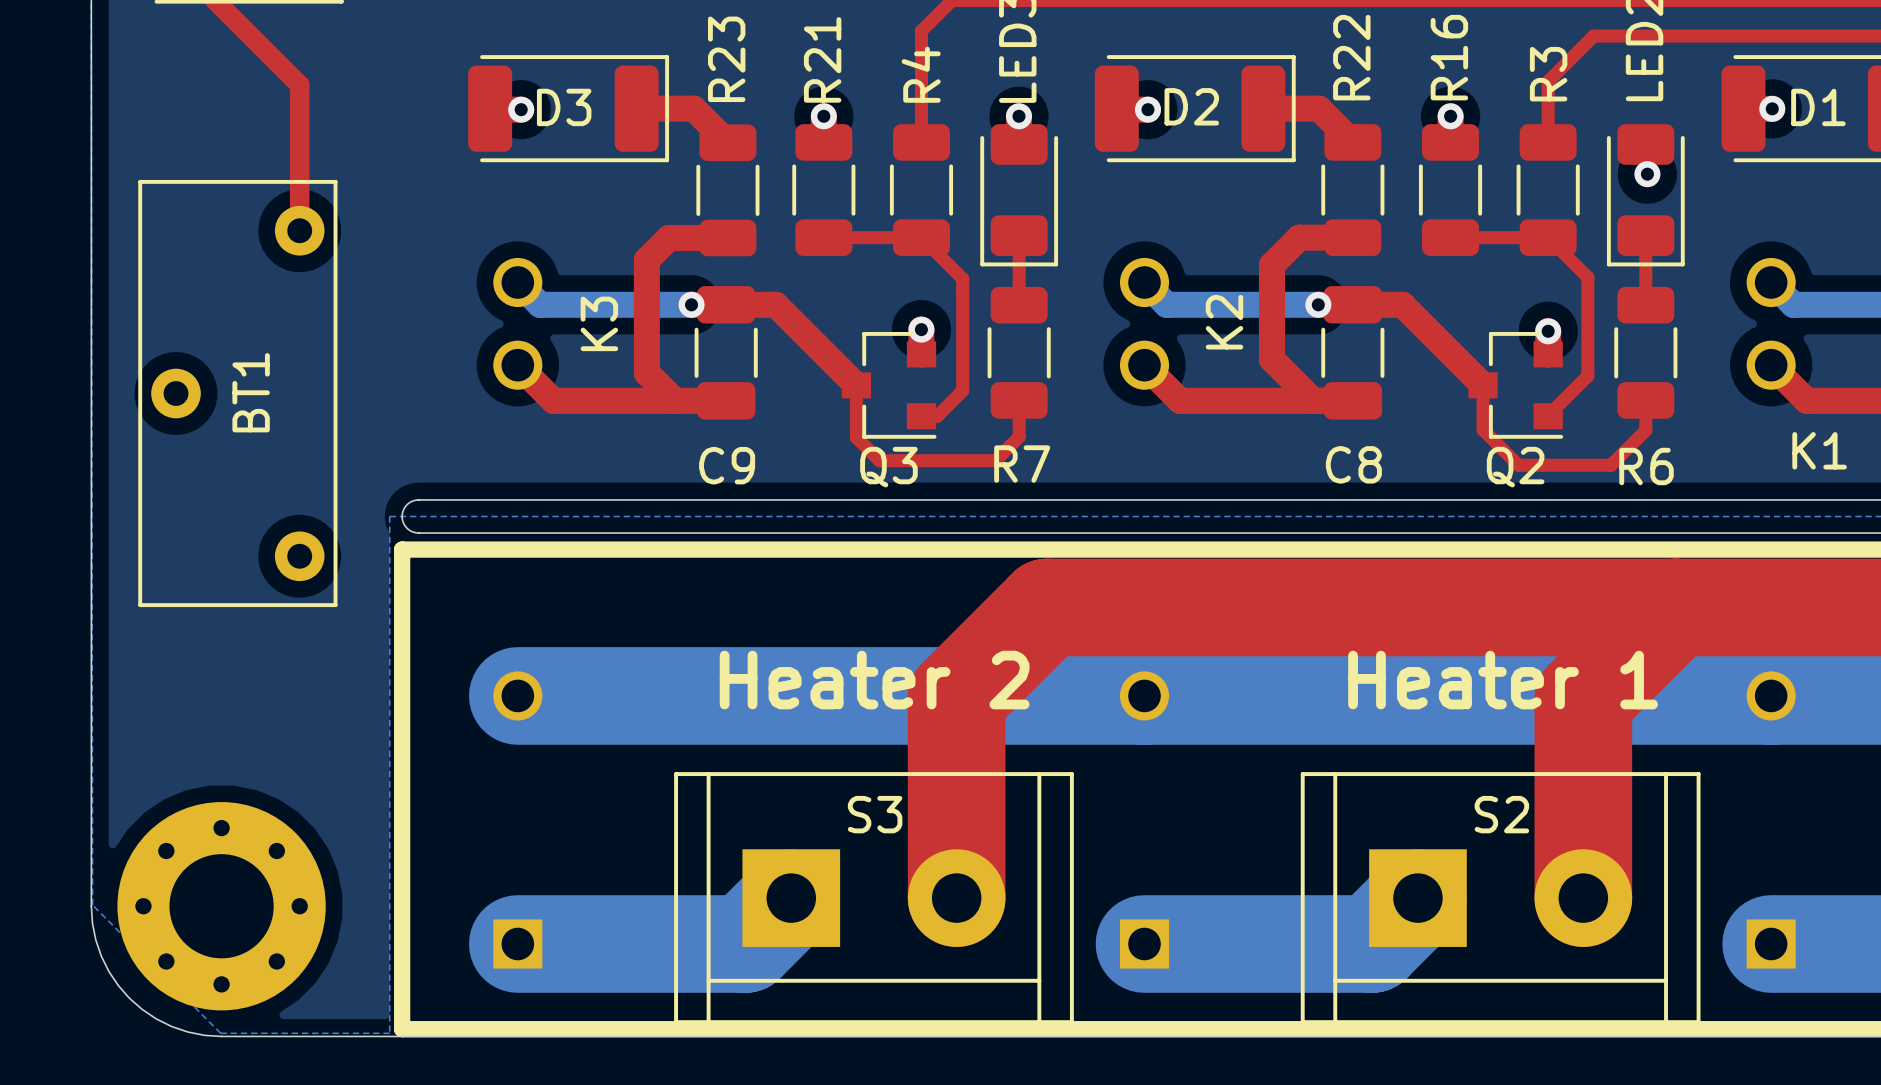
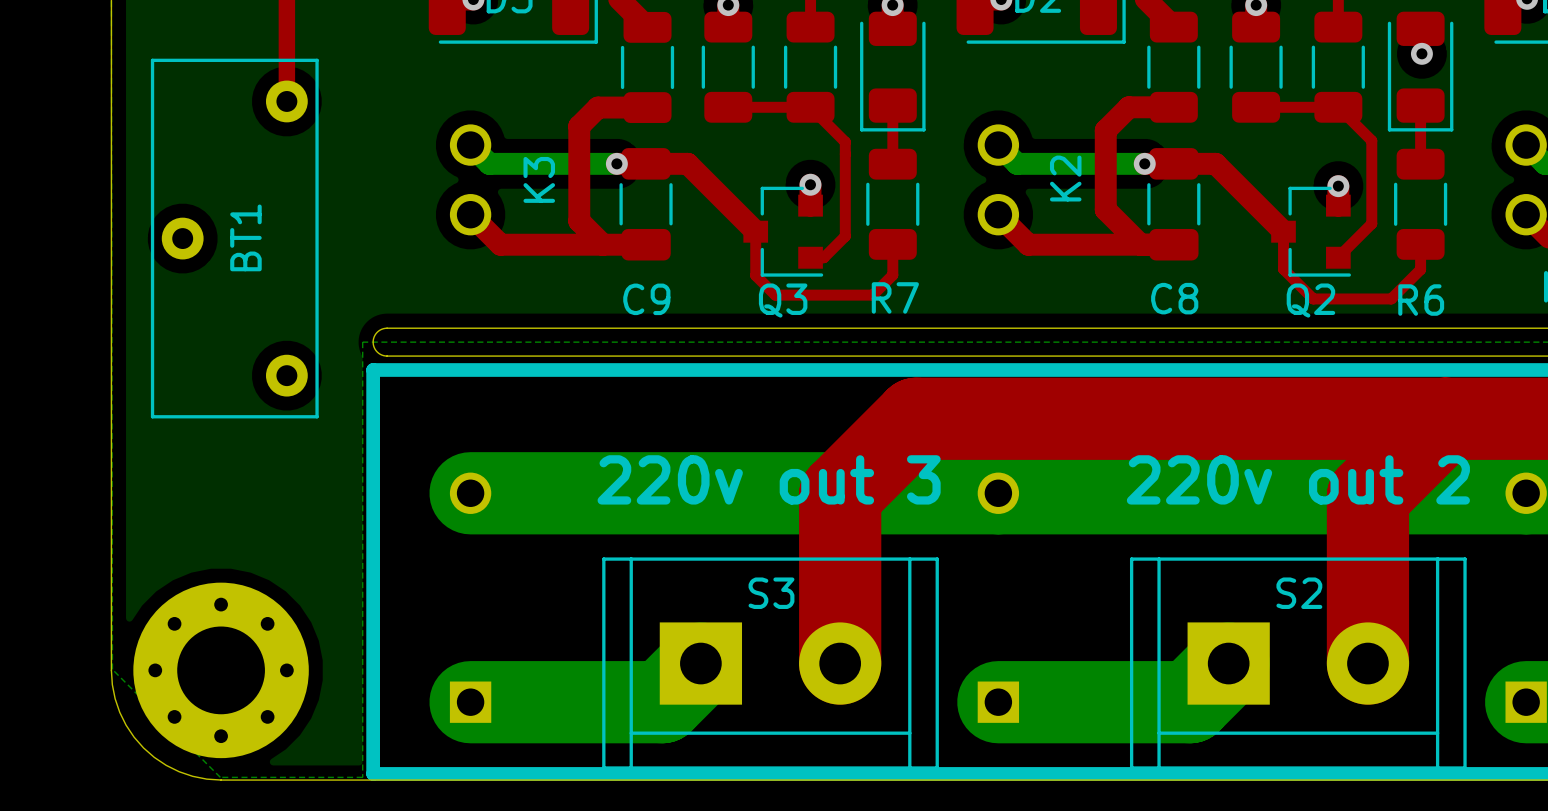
text: Heater 2 (874, 680) -> 220v out 3 (769, 479)
text: Heater 1 (1503, 680) -> 220v out 2 (1298, 479)

